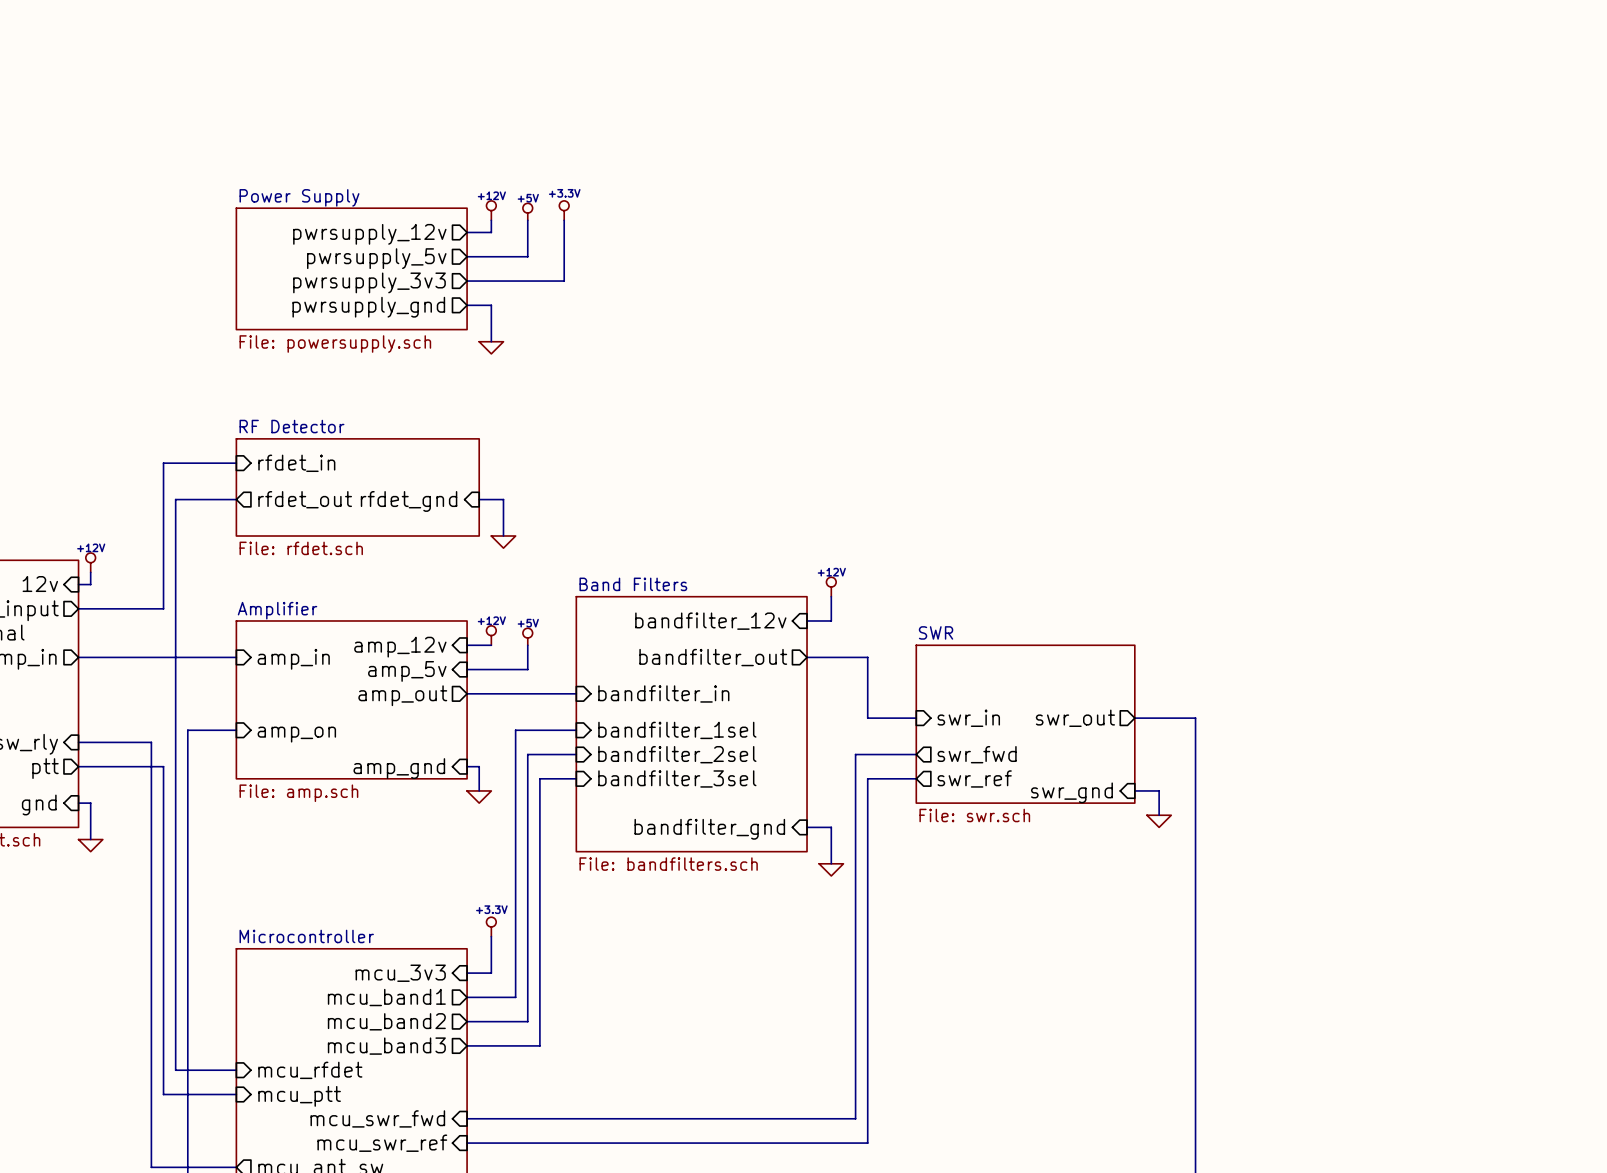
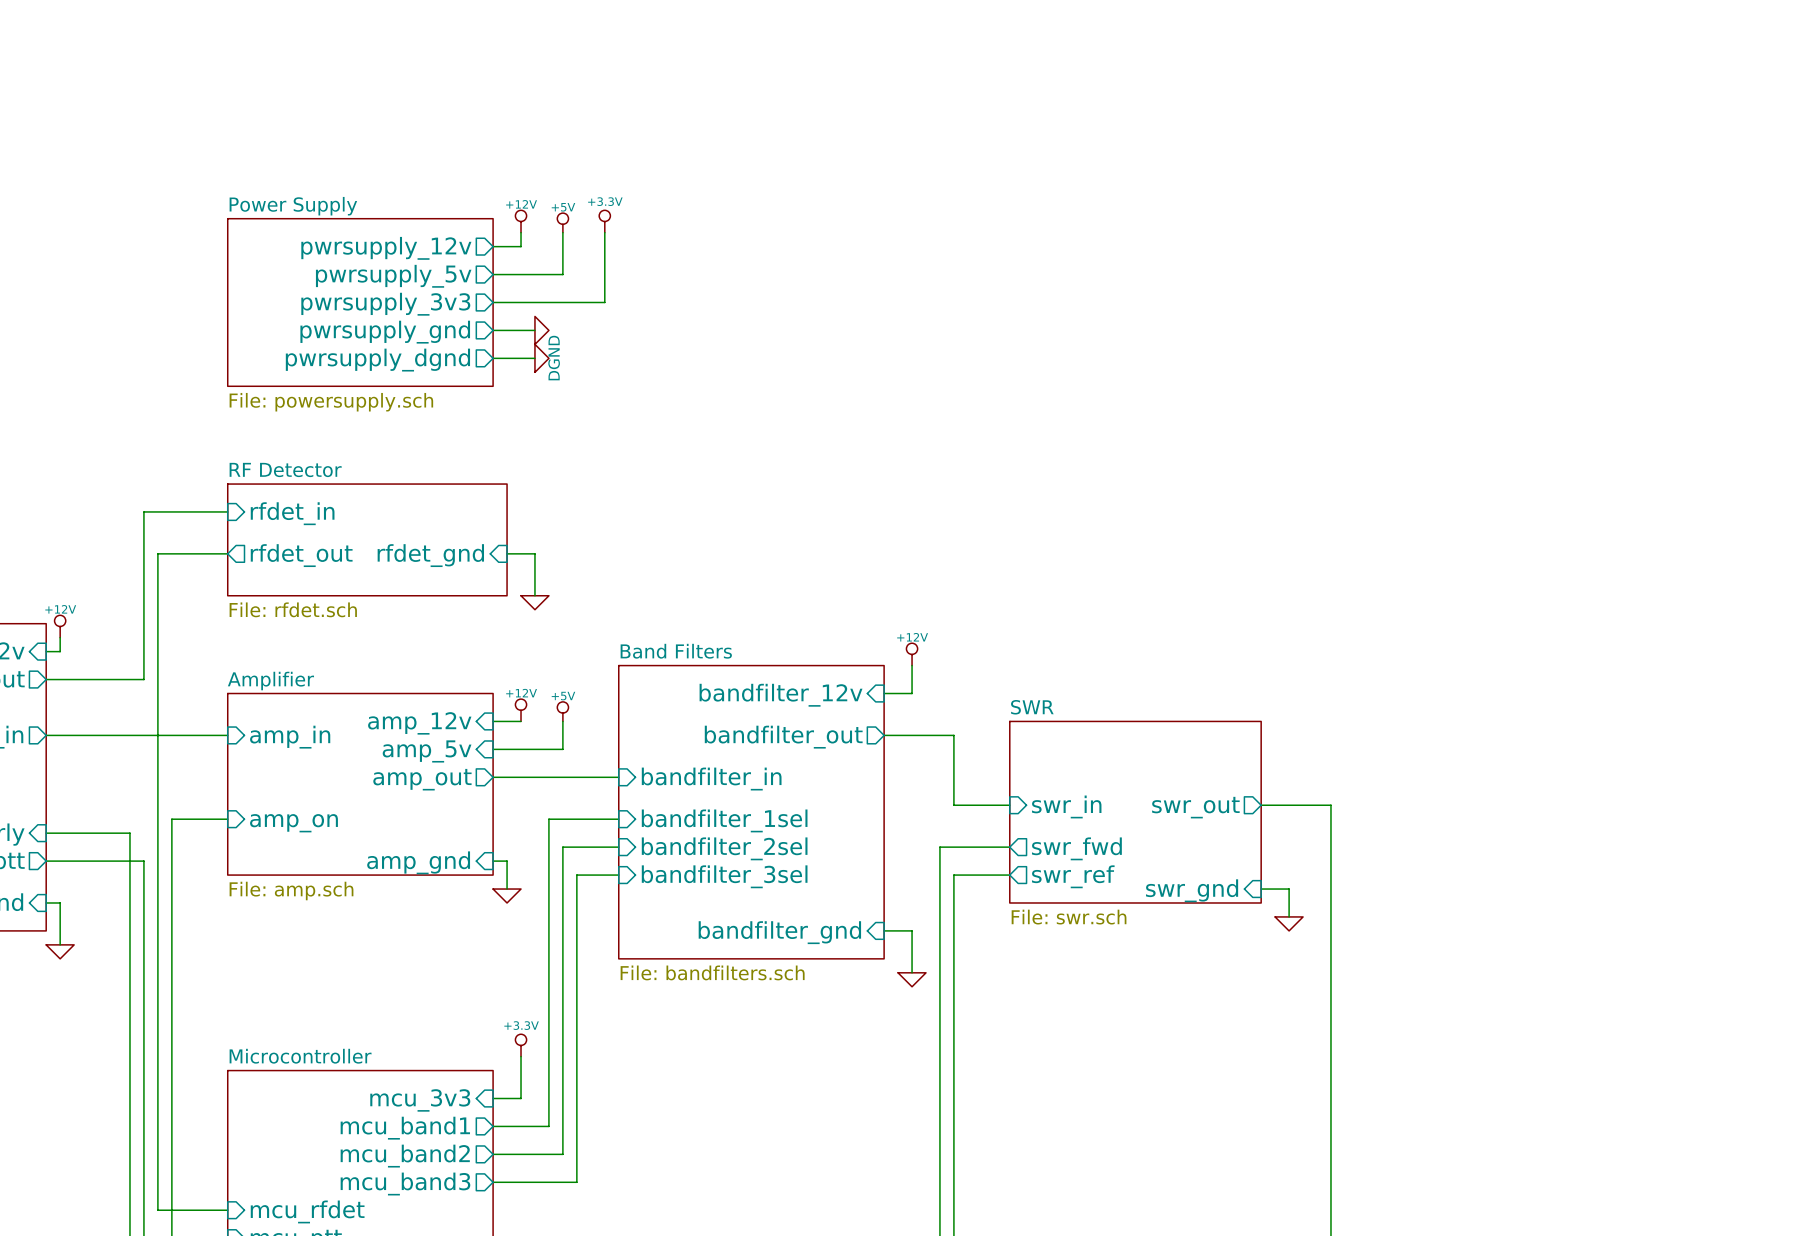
sheet Power Supply: File: powersupply.sch (351, 268) -> none
sheet Power Supply: none -> File: powersupply.sch (360, 302)
wire: (491, 305) (491, 341) -> (521, 330) (534, 330)
wire: none -> (493, 358) (534, 358)
power symbol: none -> DGND (541, 358)
sheet pin: none -> pwrsupply_dgnd (377, 360)
power symbol rotation: 0° (491, 347) -> 90° counterclockwise (541, 330)
power symbol position: (491, 347) -> (541, 330)

